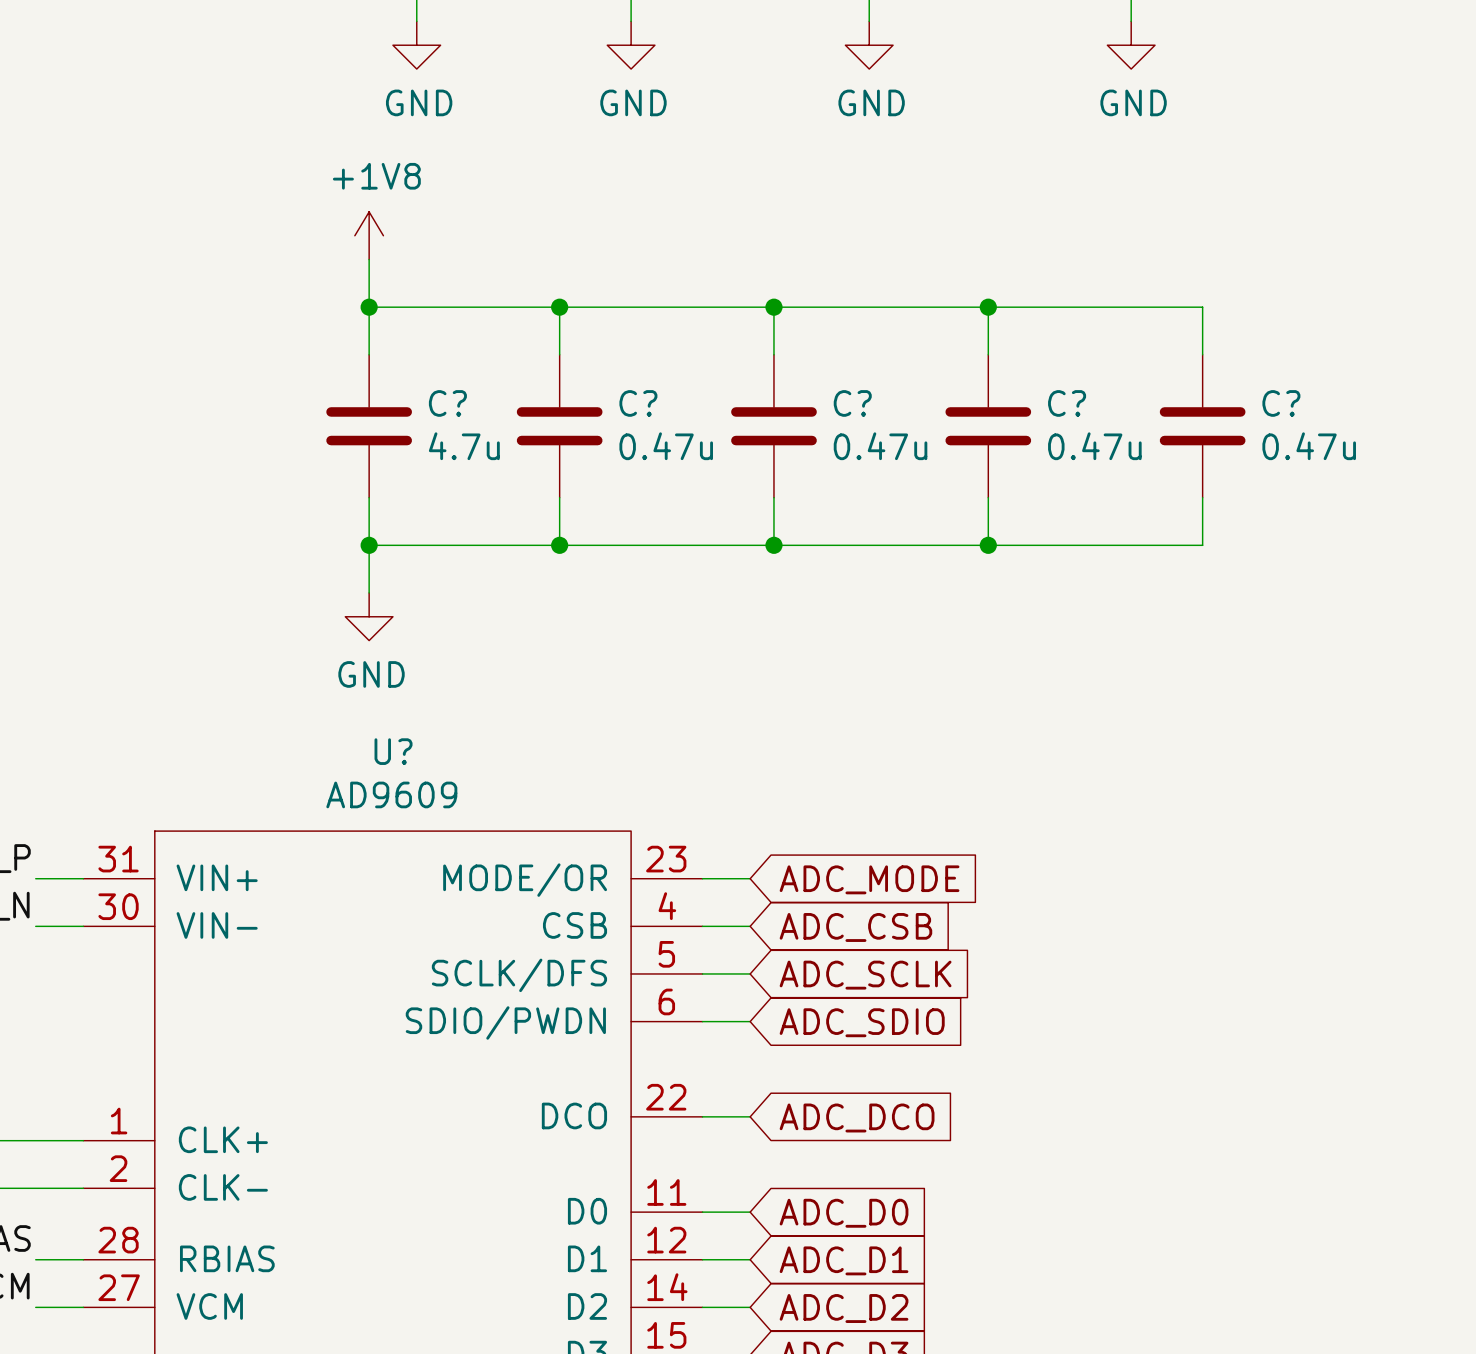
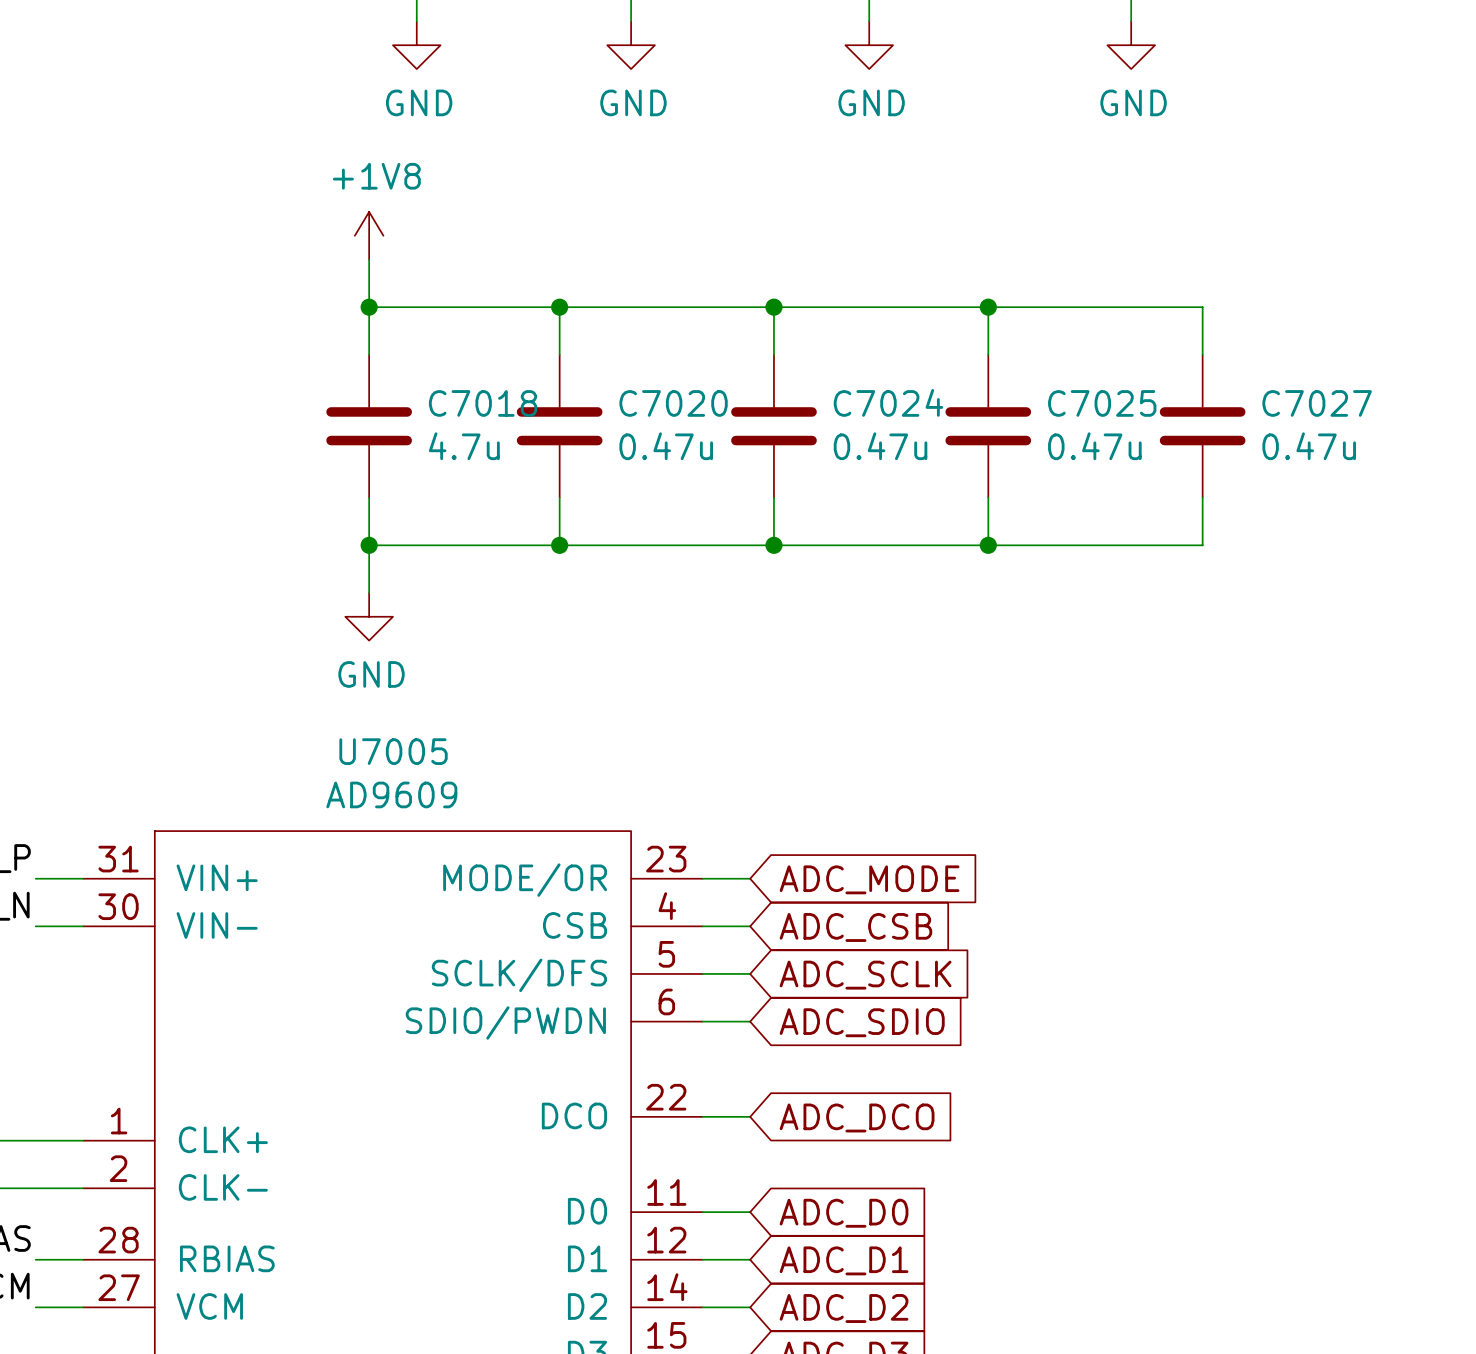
C? name: C? (447, 403) -> C7018 (483, 403)
C? name: C? (638, 403) -> C7020 (673, 403)
C? name: C? (852, 403) -> C7024 (888, 402)
C? name: C? (1067, 403) -> C7025 (1102, 403)
C? name: C? (1281, 403) -> C7027 (1317, 403)
U? name: U? (393, 751) -> U7005 (393, 751)

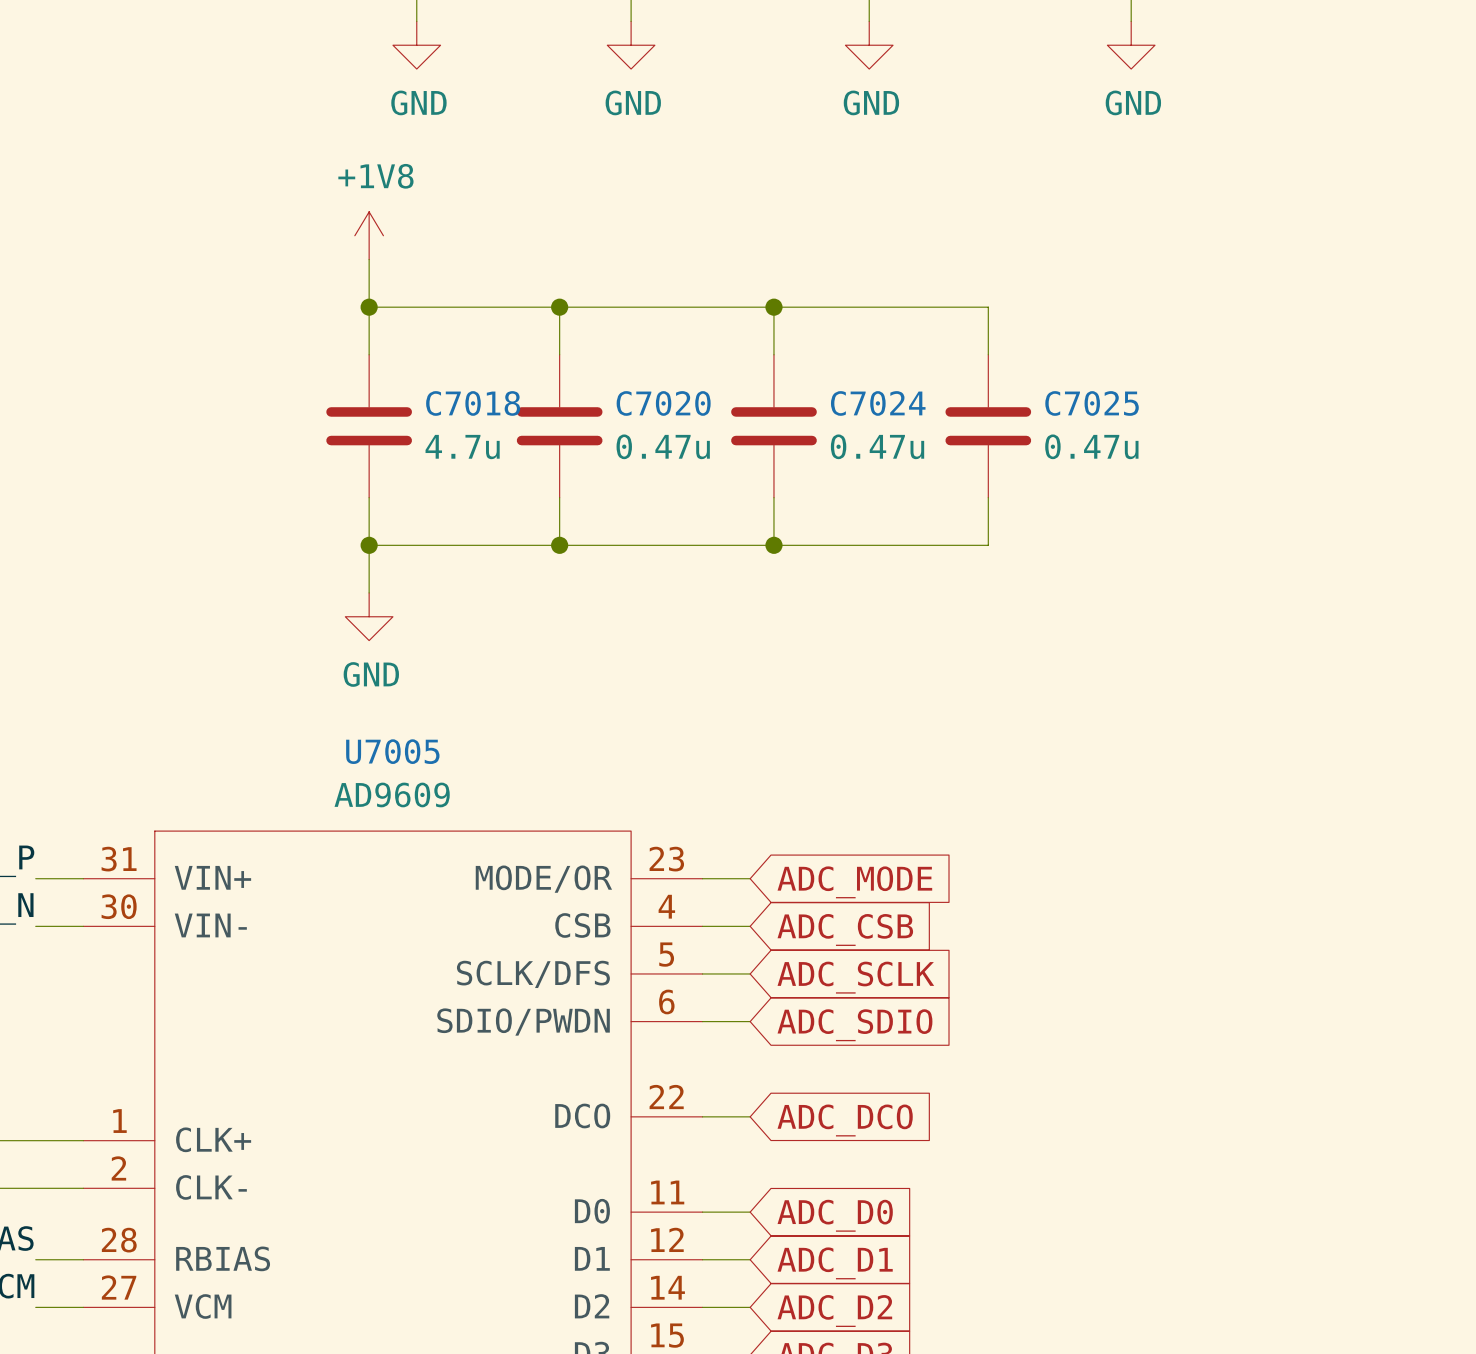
wire: (988, 307) (1202, 307) (1202, 354) -> none
junction: (988, 307) -> none
C7027: 0.47u (1202, 426) -> none
wire: (1202, 497) (1202, 545) (988, 545) -> none
junction: (988, 545) -> none

